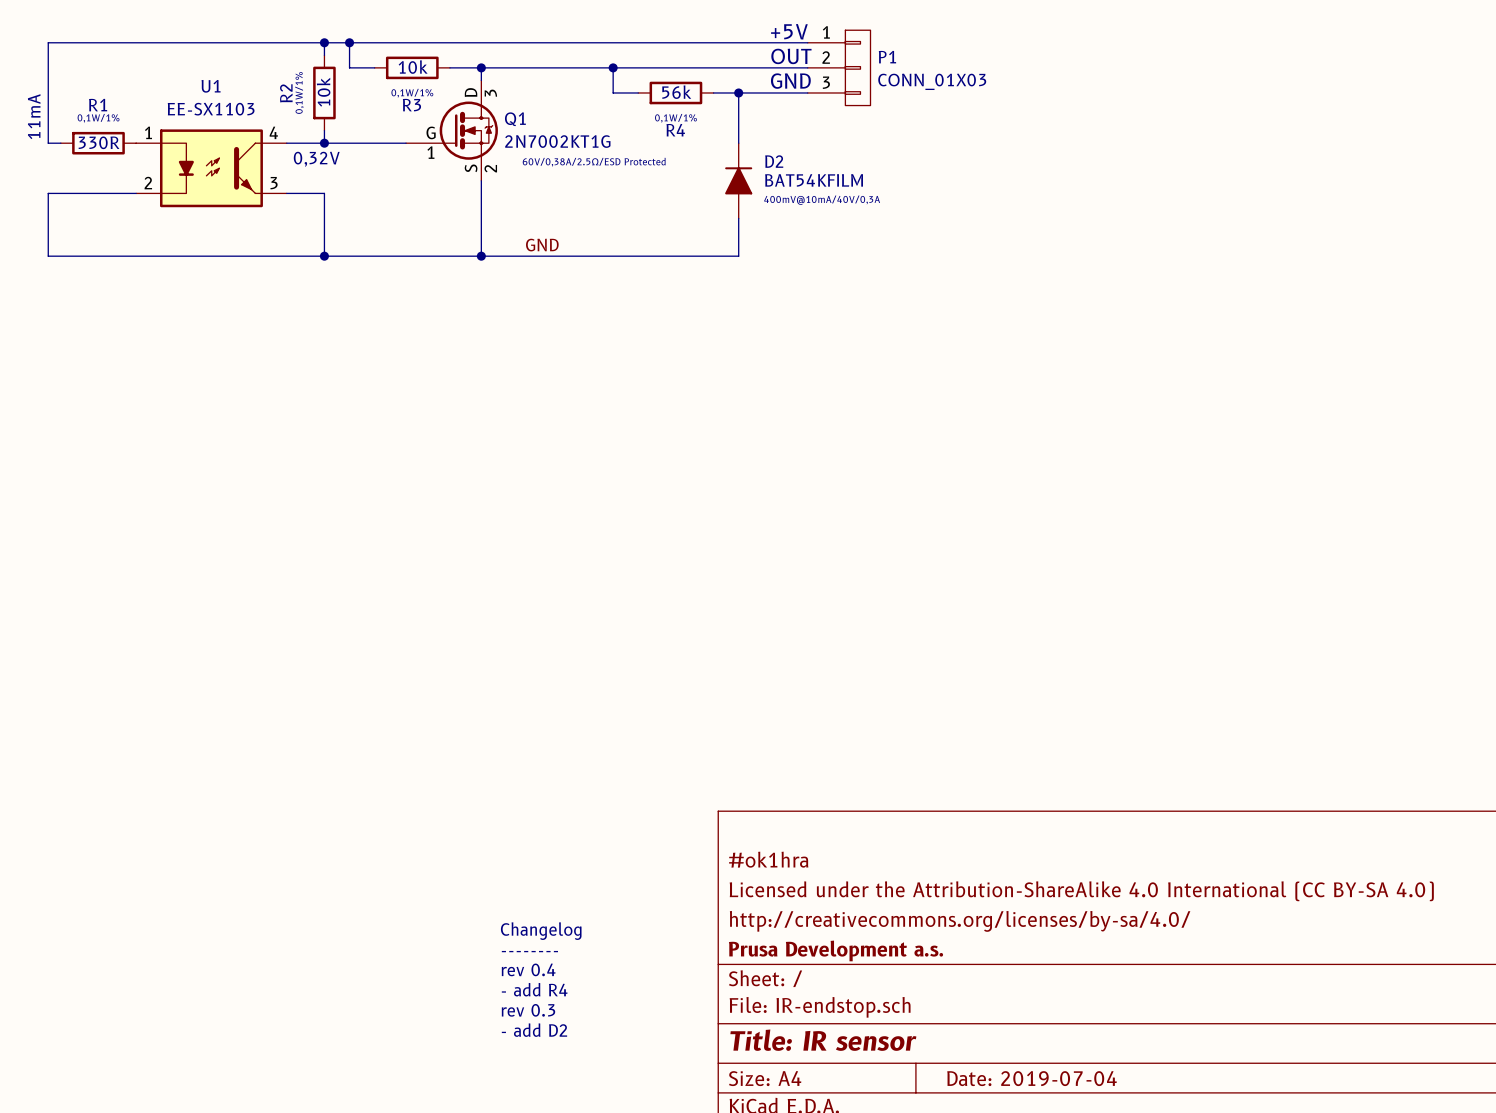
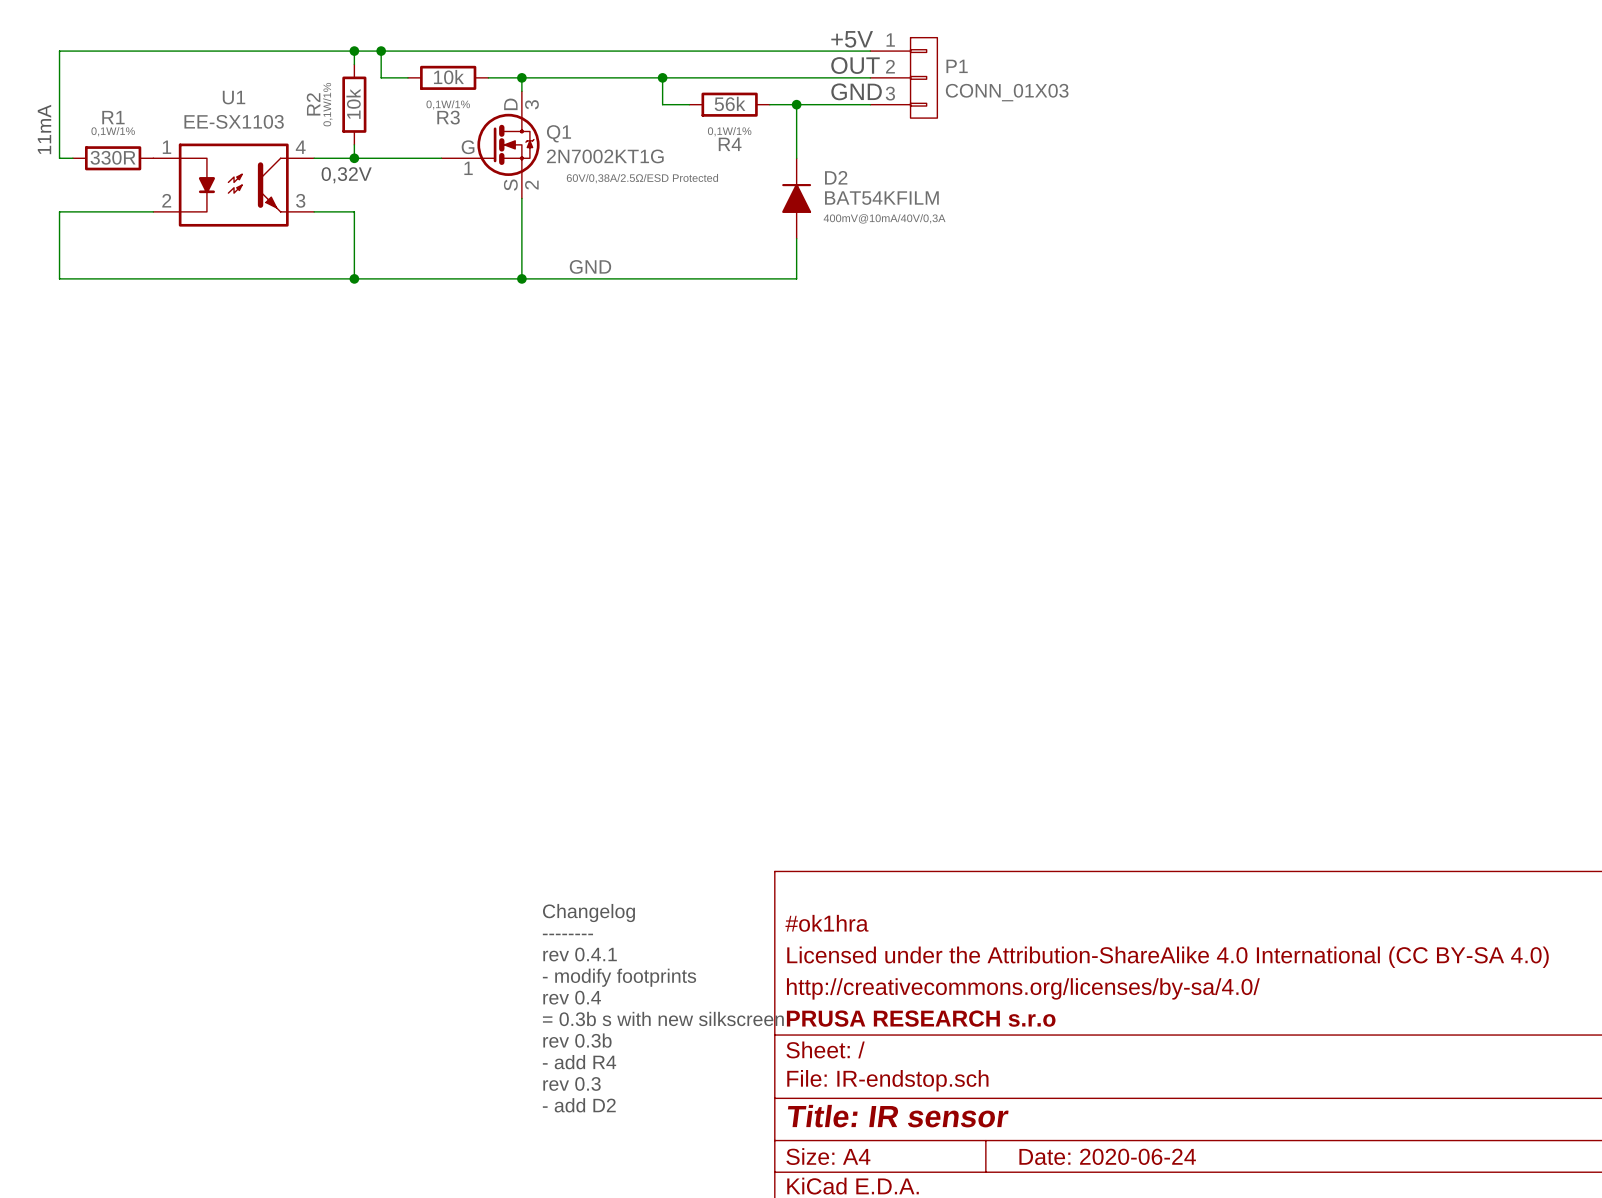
text: none -> Changelog (588, 913)
text: none -> -------- (567, 934)
text: none -> rev 0.4.1 (580, 954)
text: none -> - modify footprints (619, 977)
text: Changelog (541, 931) -> rev 0.4 (572, 997)
title block: Prusa Development a.s. (836, 950) -> PRUSA RESEARCH s.r.o (921, 1018)
text: -------- (529, 951) -> = 0.3b s with new silkscreen (663, 1018)
text: rev 0.4 (528, 969) -> rev 0.3b (577, 1040)
title block: Date: 2019-07-04 (1032, 1078) -> Date: 2020-06-24 (1107, 1156)

